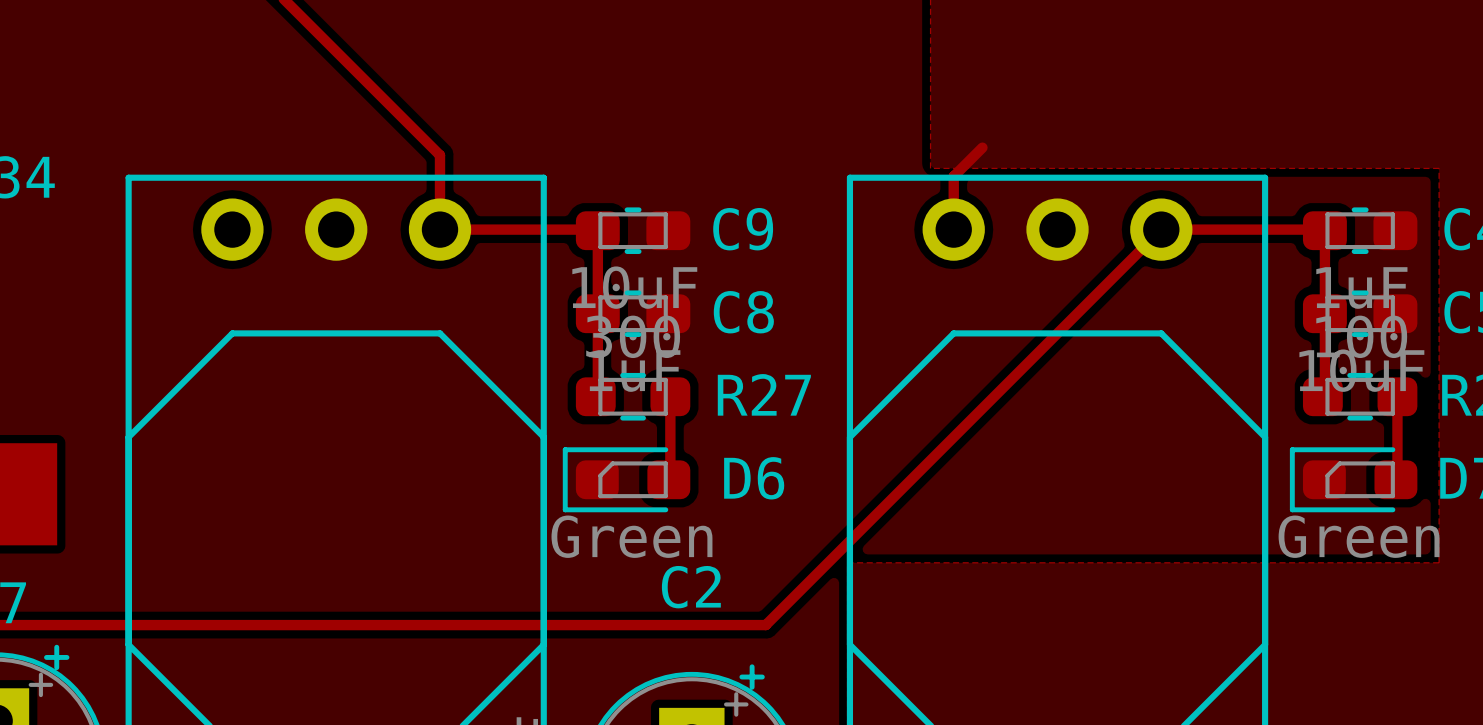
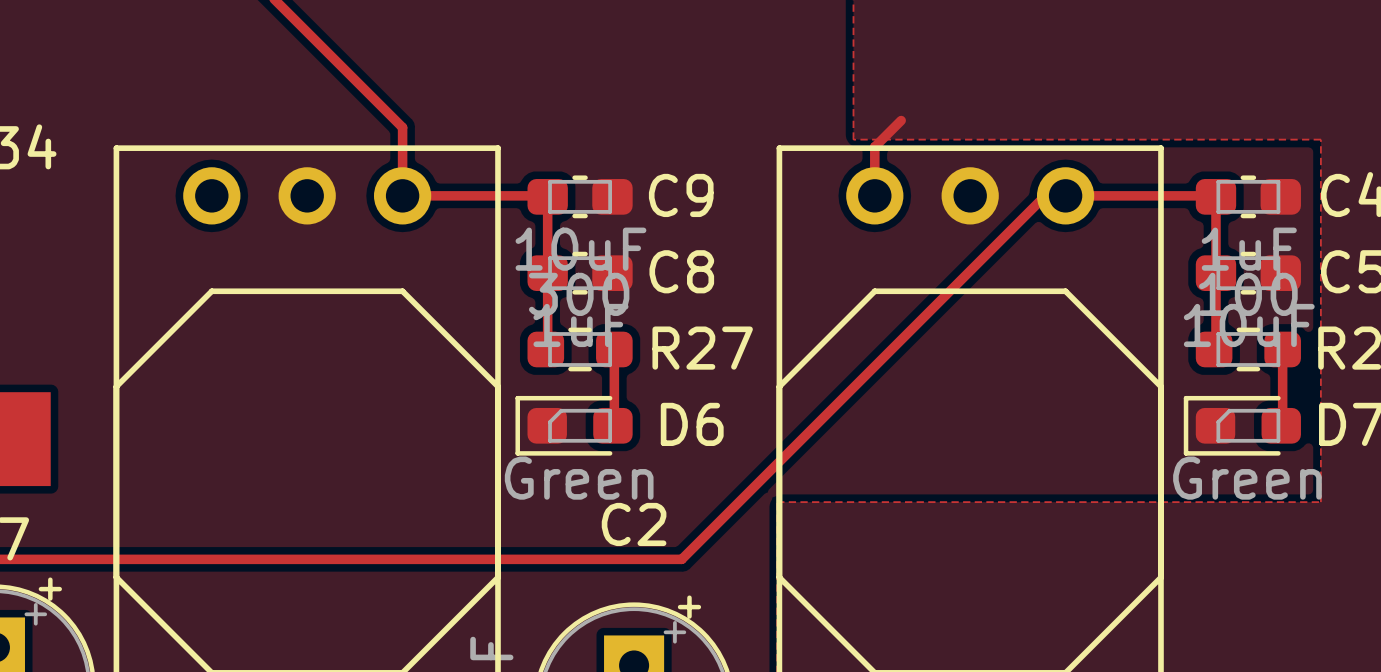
track: (1161, 229) (765, 625) (743, 625) -> (1065, 195) (1045, 195) (681, 559)

